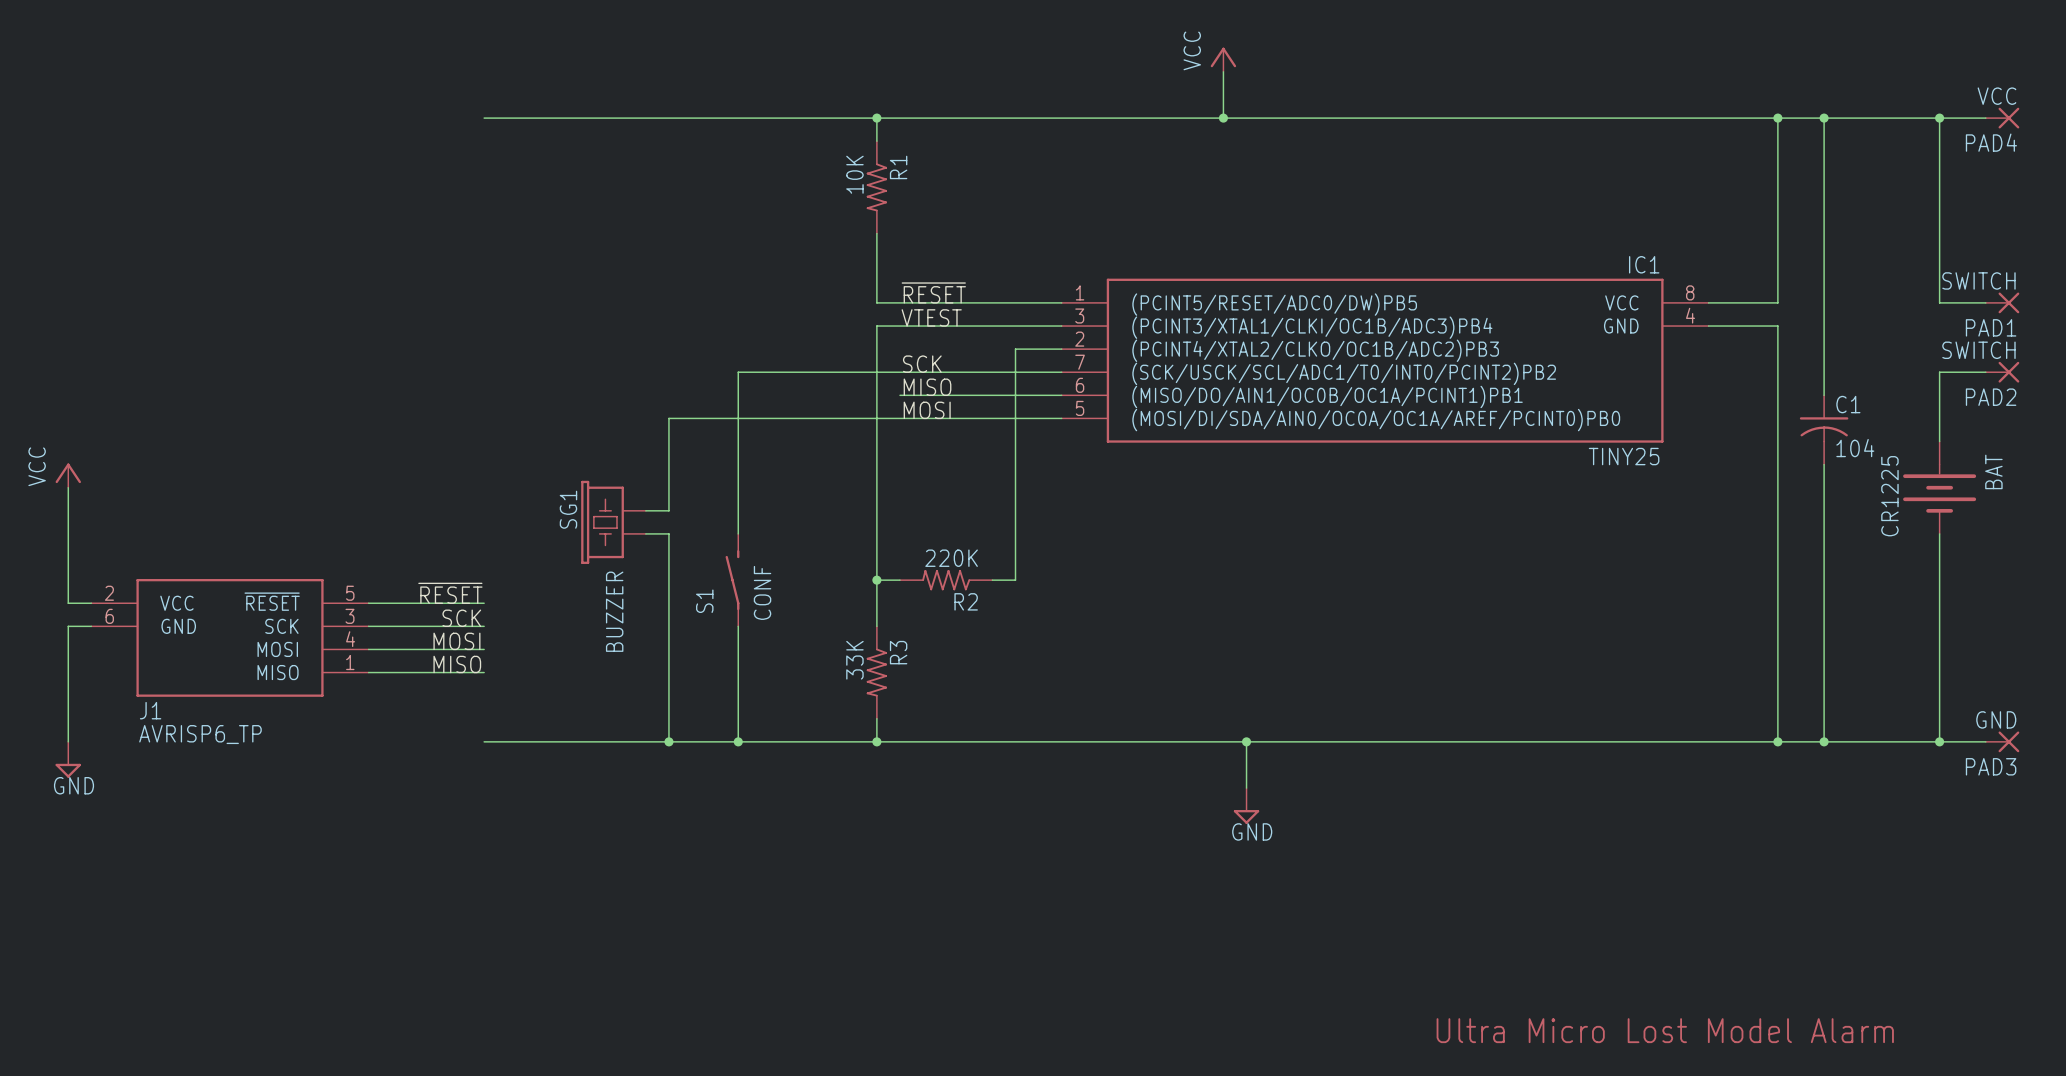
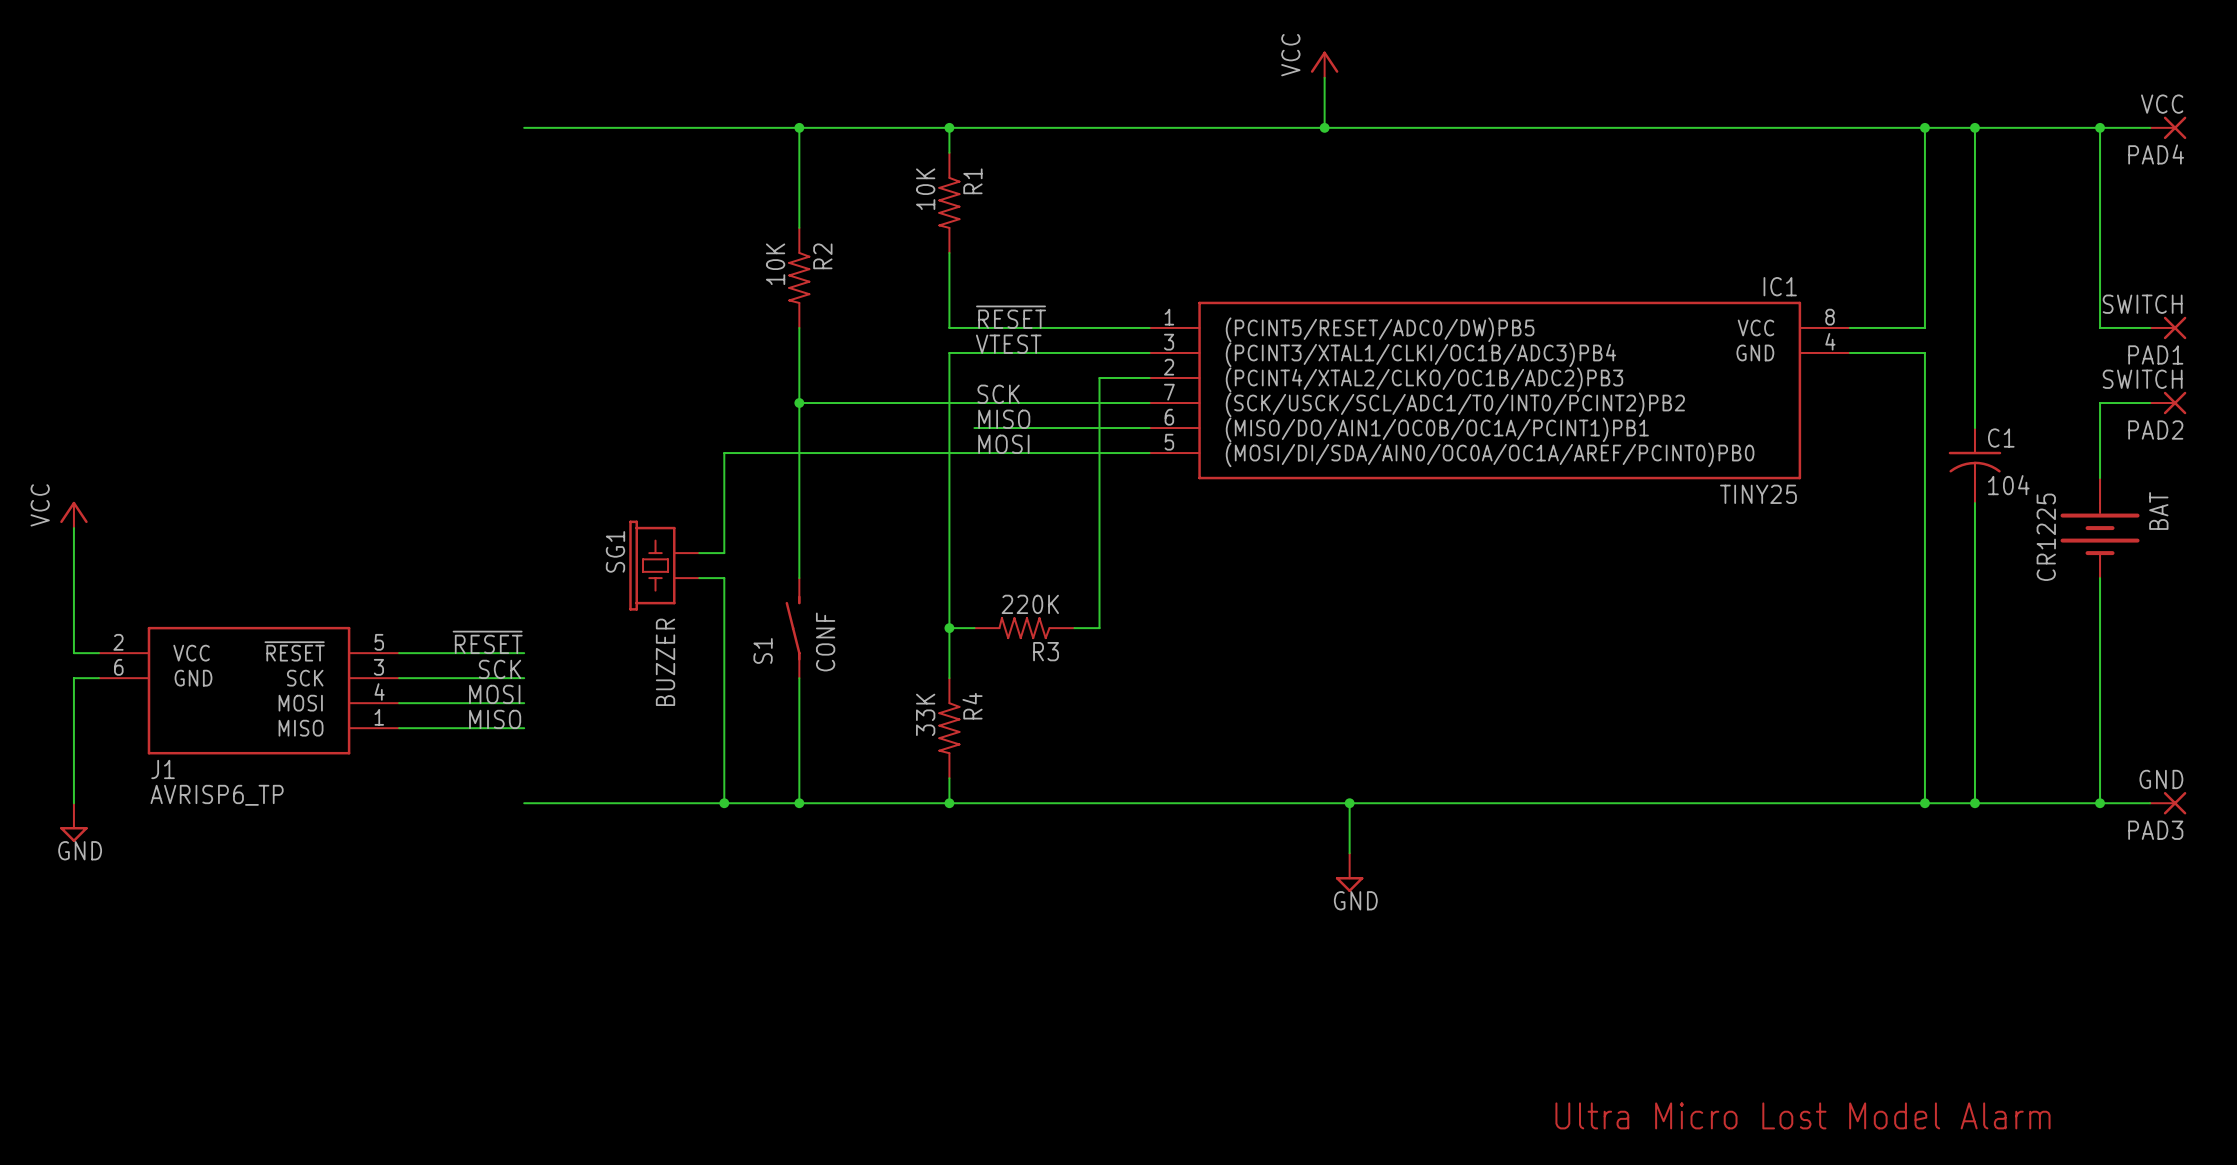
wire: none -> (799, 127) (799, 227)
junction: none -> (799, 127)
R2: none -> 10K (799, 277)
wire: none -> (799, 327) (799, 403)
junction: none -> (799, 403)
R2 name: R2 (966, 601) -> R3 (1046, 651)
R3 name: R3 (898, 652) -> R4 (972, 706)

